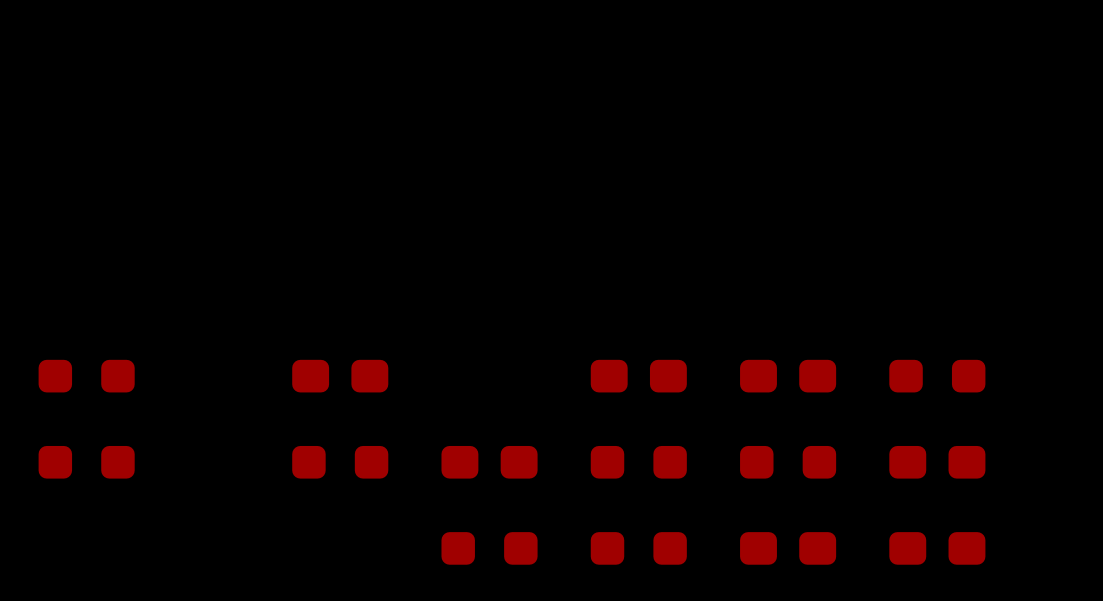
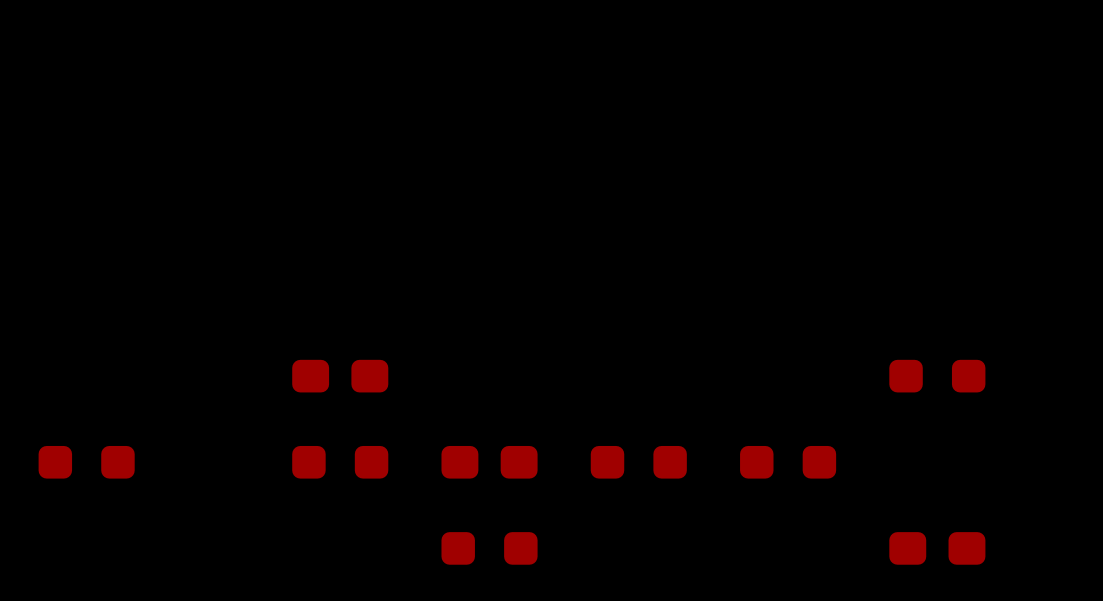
part: (86, 376) -> none
part: (638, 376) -> none
part: (788, 376) -> none
part: (937, 462) -> none
part: (638, 548) -> none
part: (788, 548) -> none

